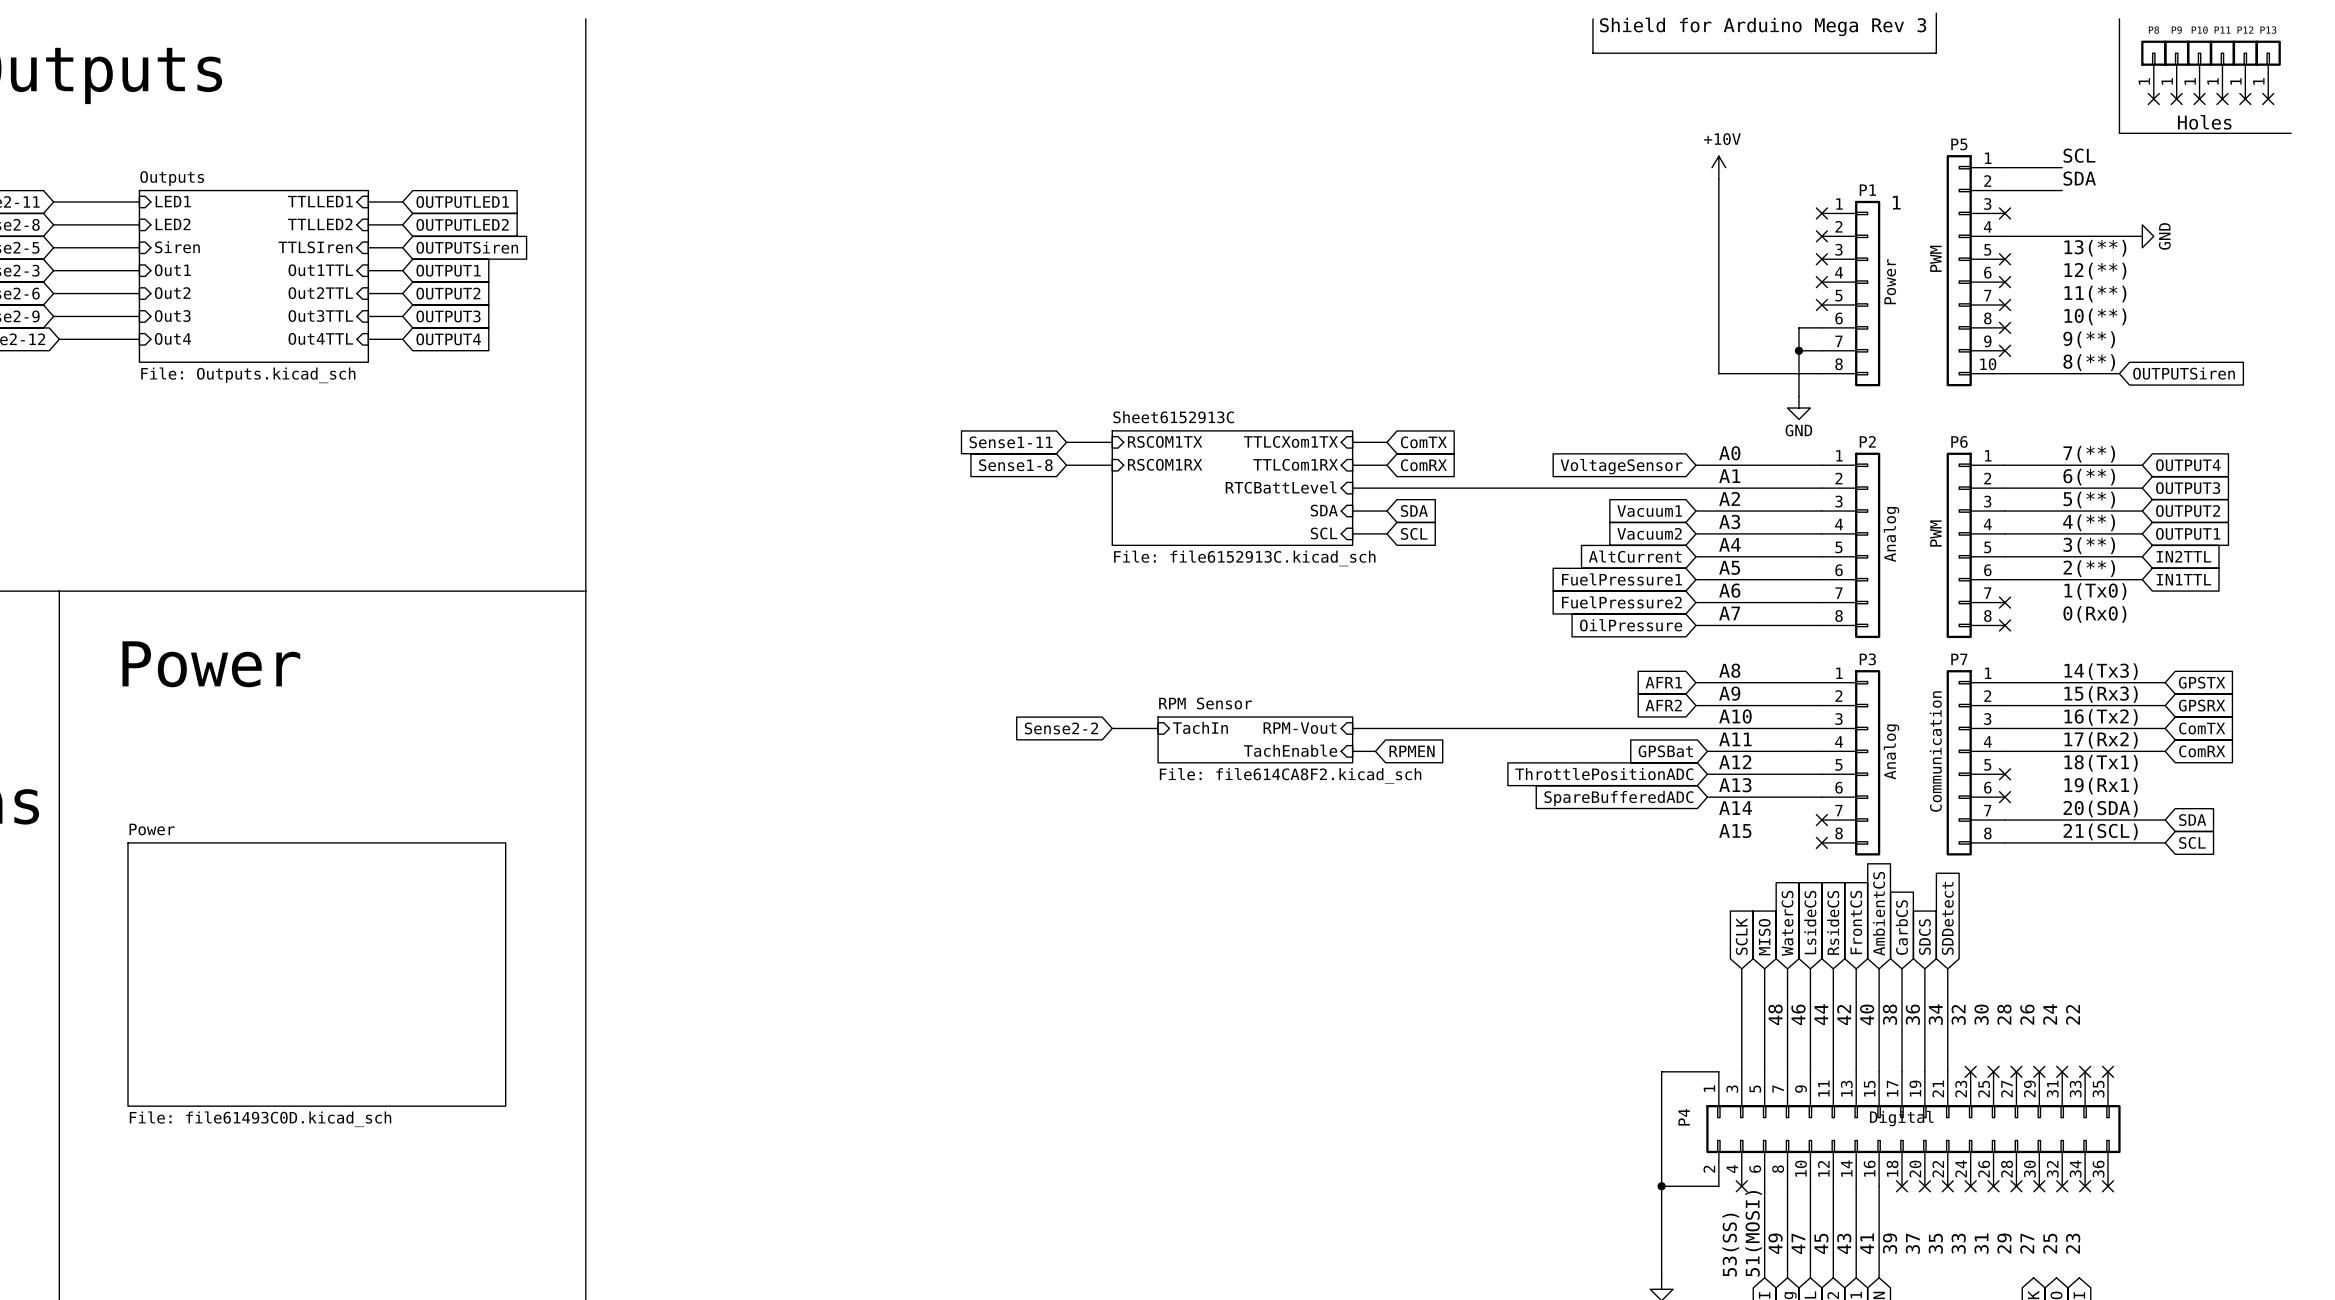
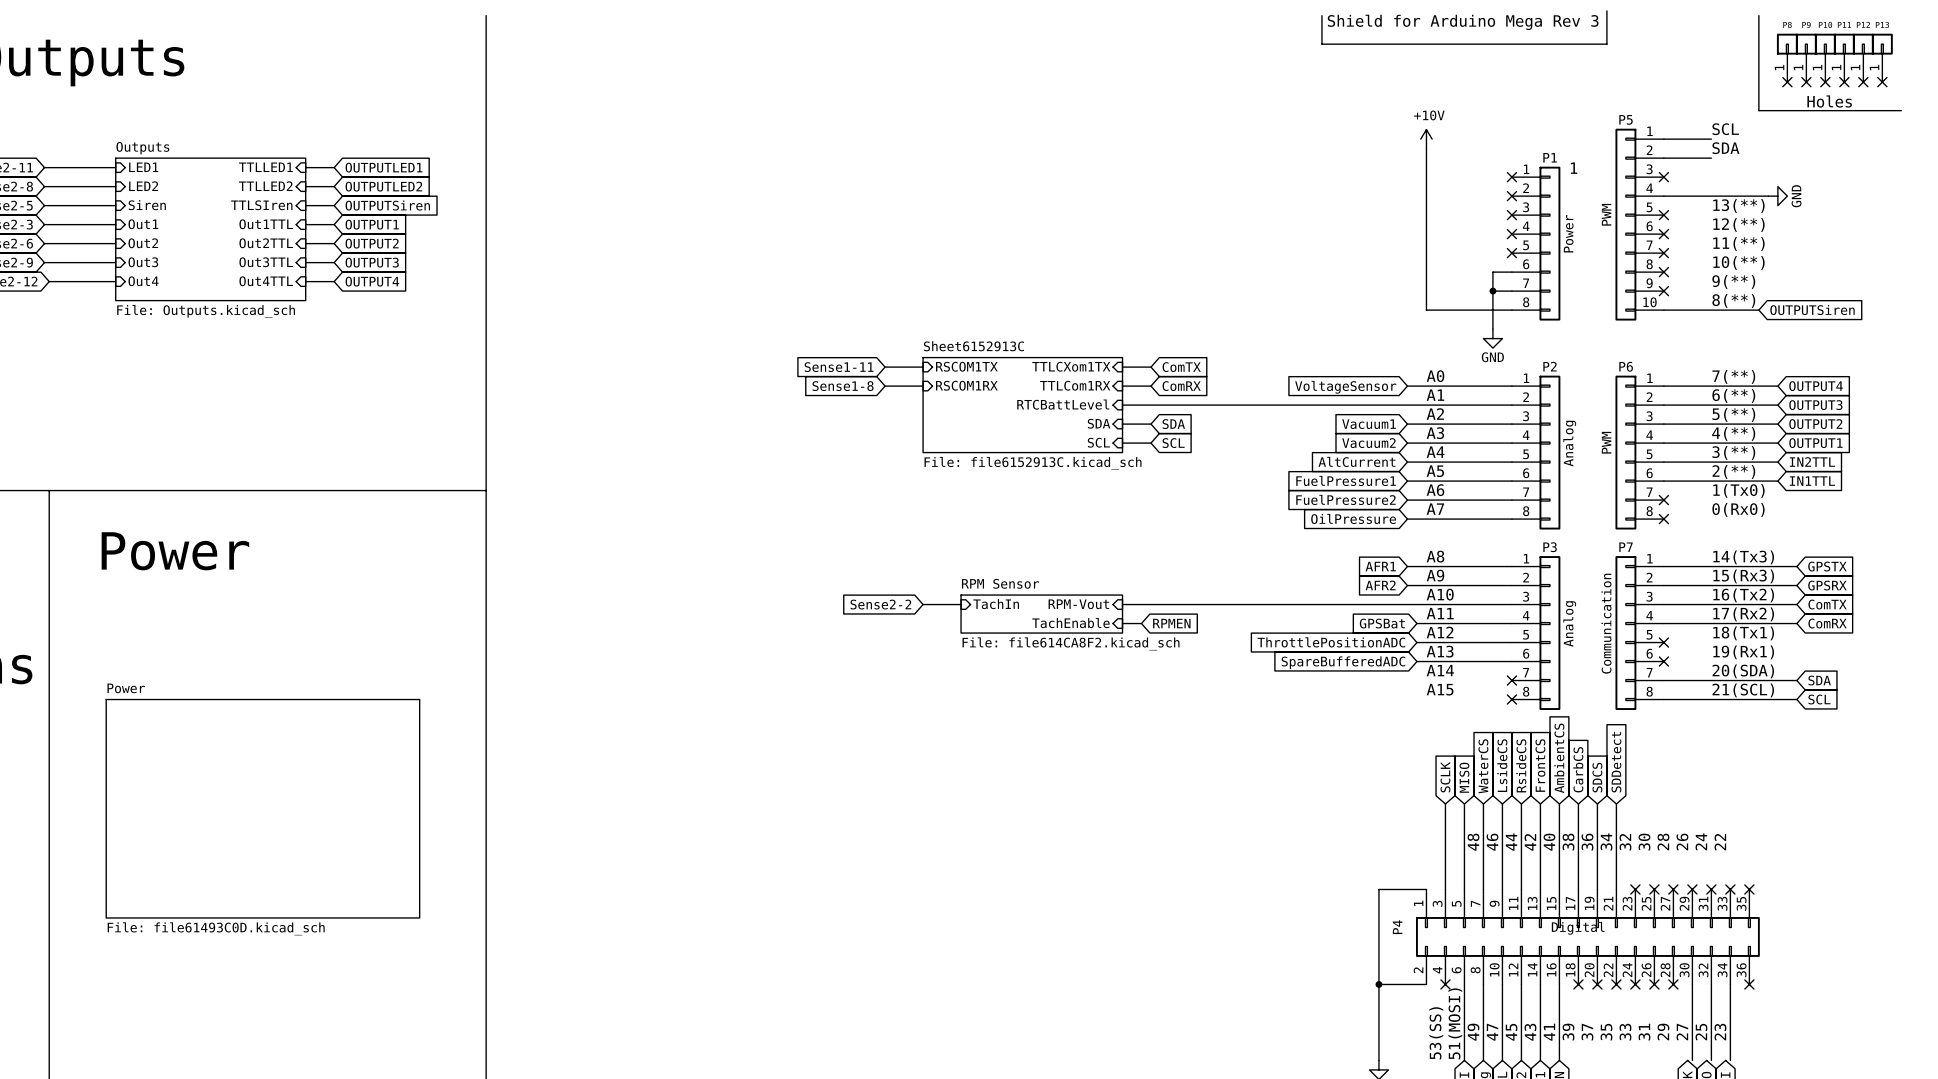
wire: none -> (1692, 984) (1692, 1060)
no-connect mark: (2039, 1186) -> none
wire: none -> (1711, 984) (1711, 1060)
no-connect mark: (2062, 1186) -> none
wire: none -> (1730, 984) (1730, 1060)
no-connect mark: (2085, 1186) -> none

